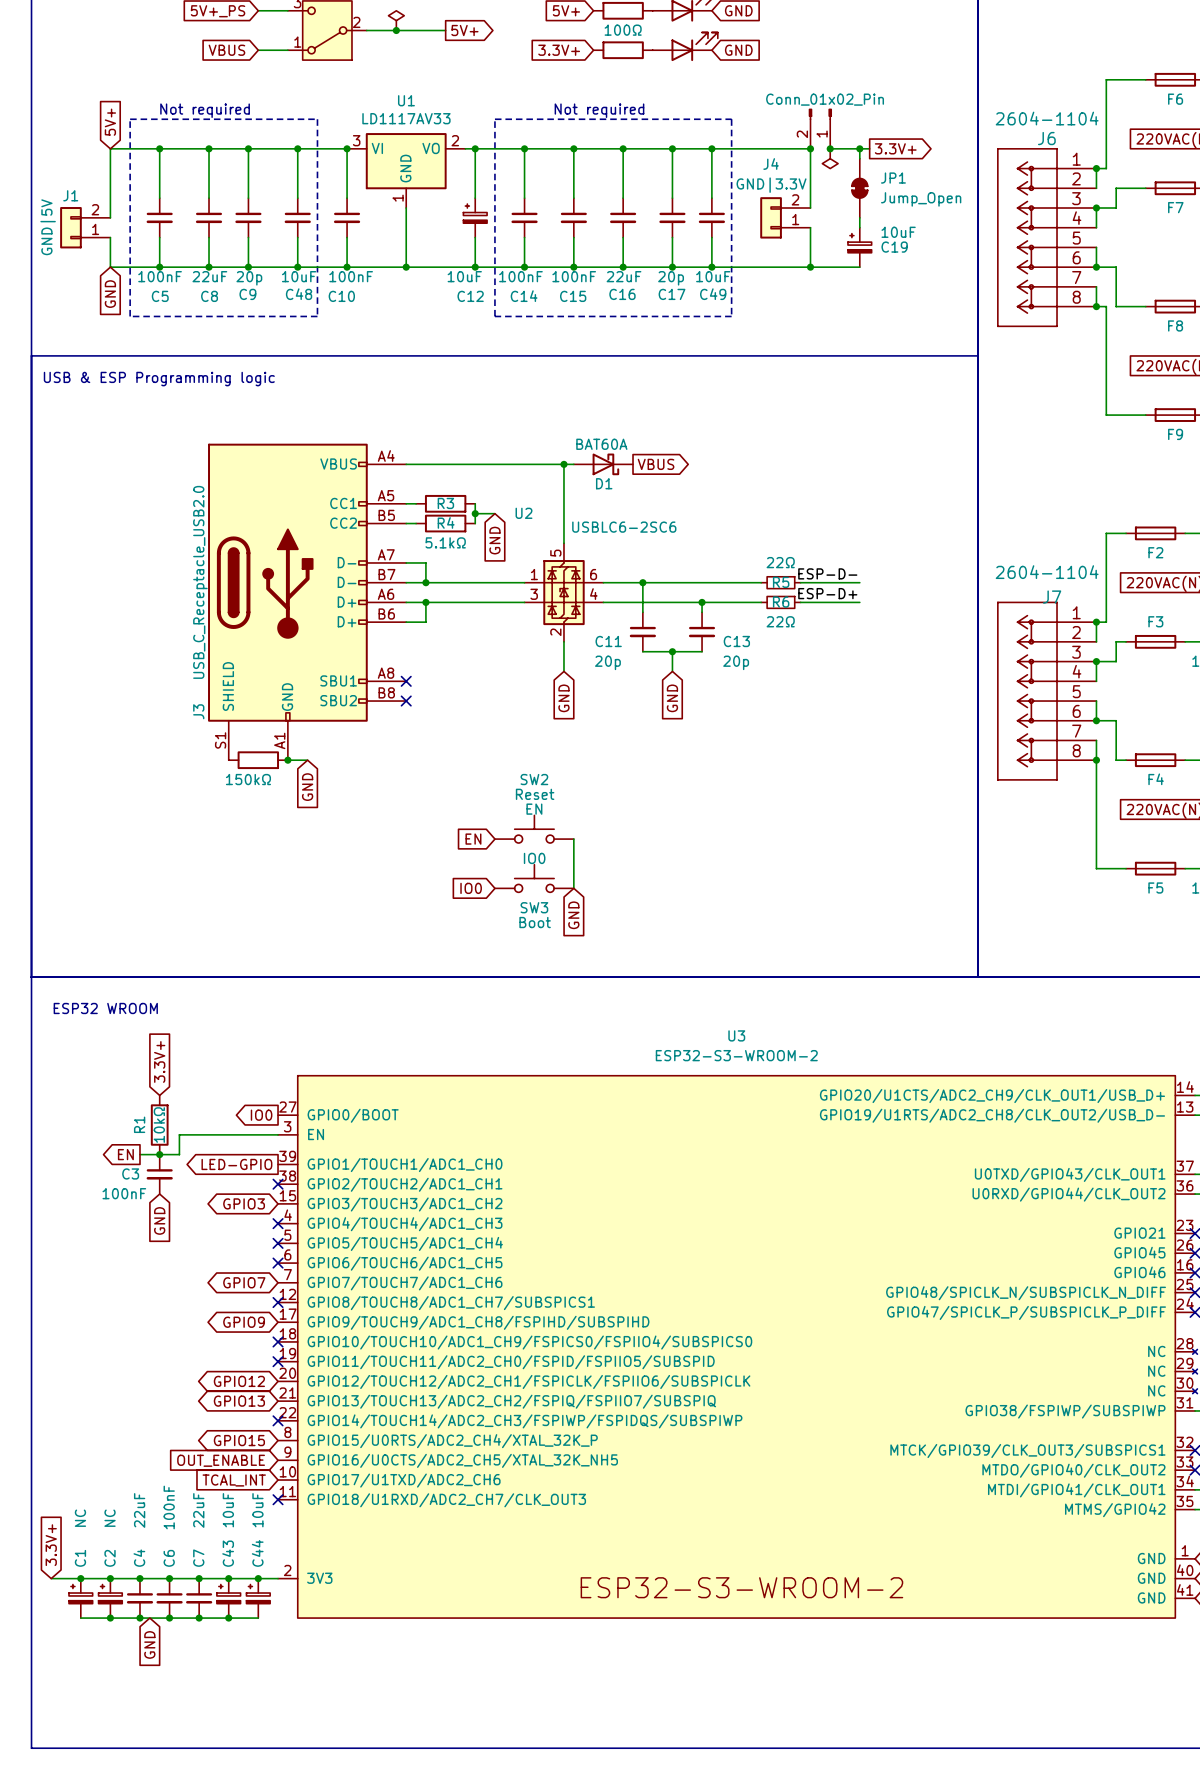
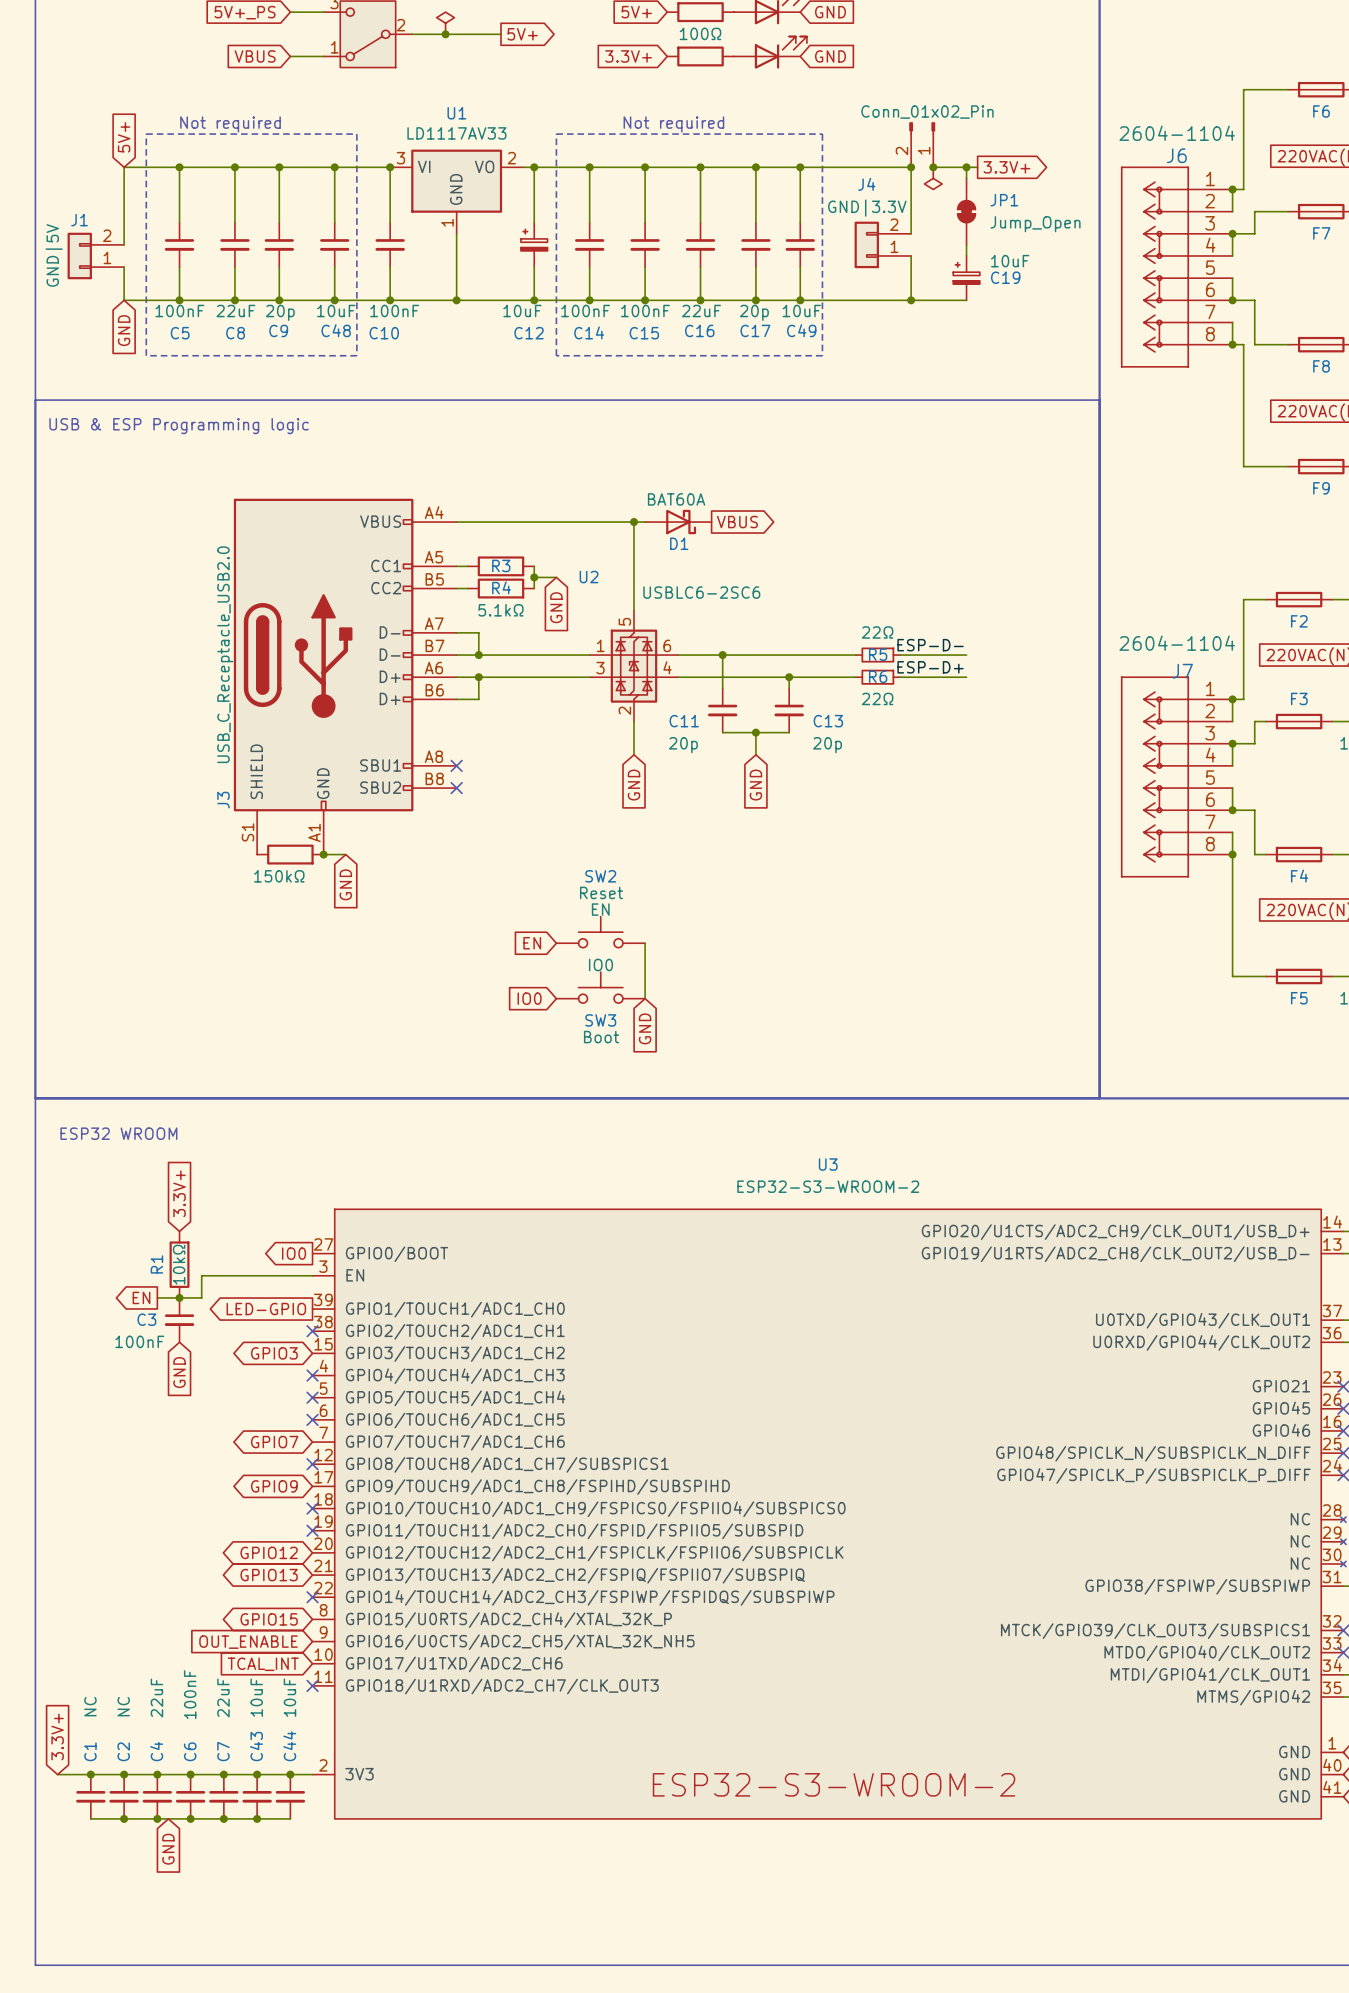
C1 symbol: [68, 1578, 93, 1619] -> [76, 1774, 106, 1819]
C2 symbol: [98, 1578, 123, 1619] -> [109, 1774, 139, 1819]
C43 symbol: [216, 1578, 241, 1619] -> [242, 1774, 272, 1819]
C44 symbol: [246, 1578, 271, 1619] -> [275, 1774, 306, 1819]

